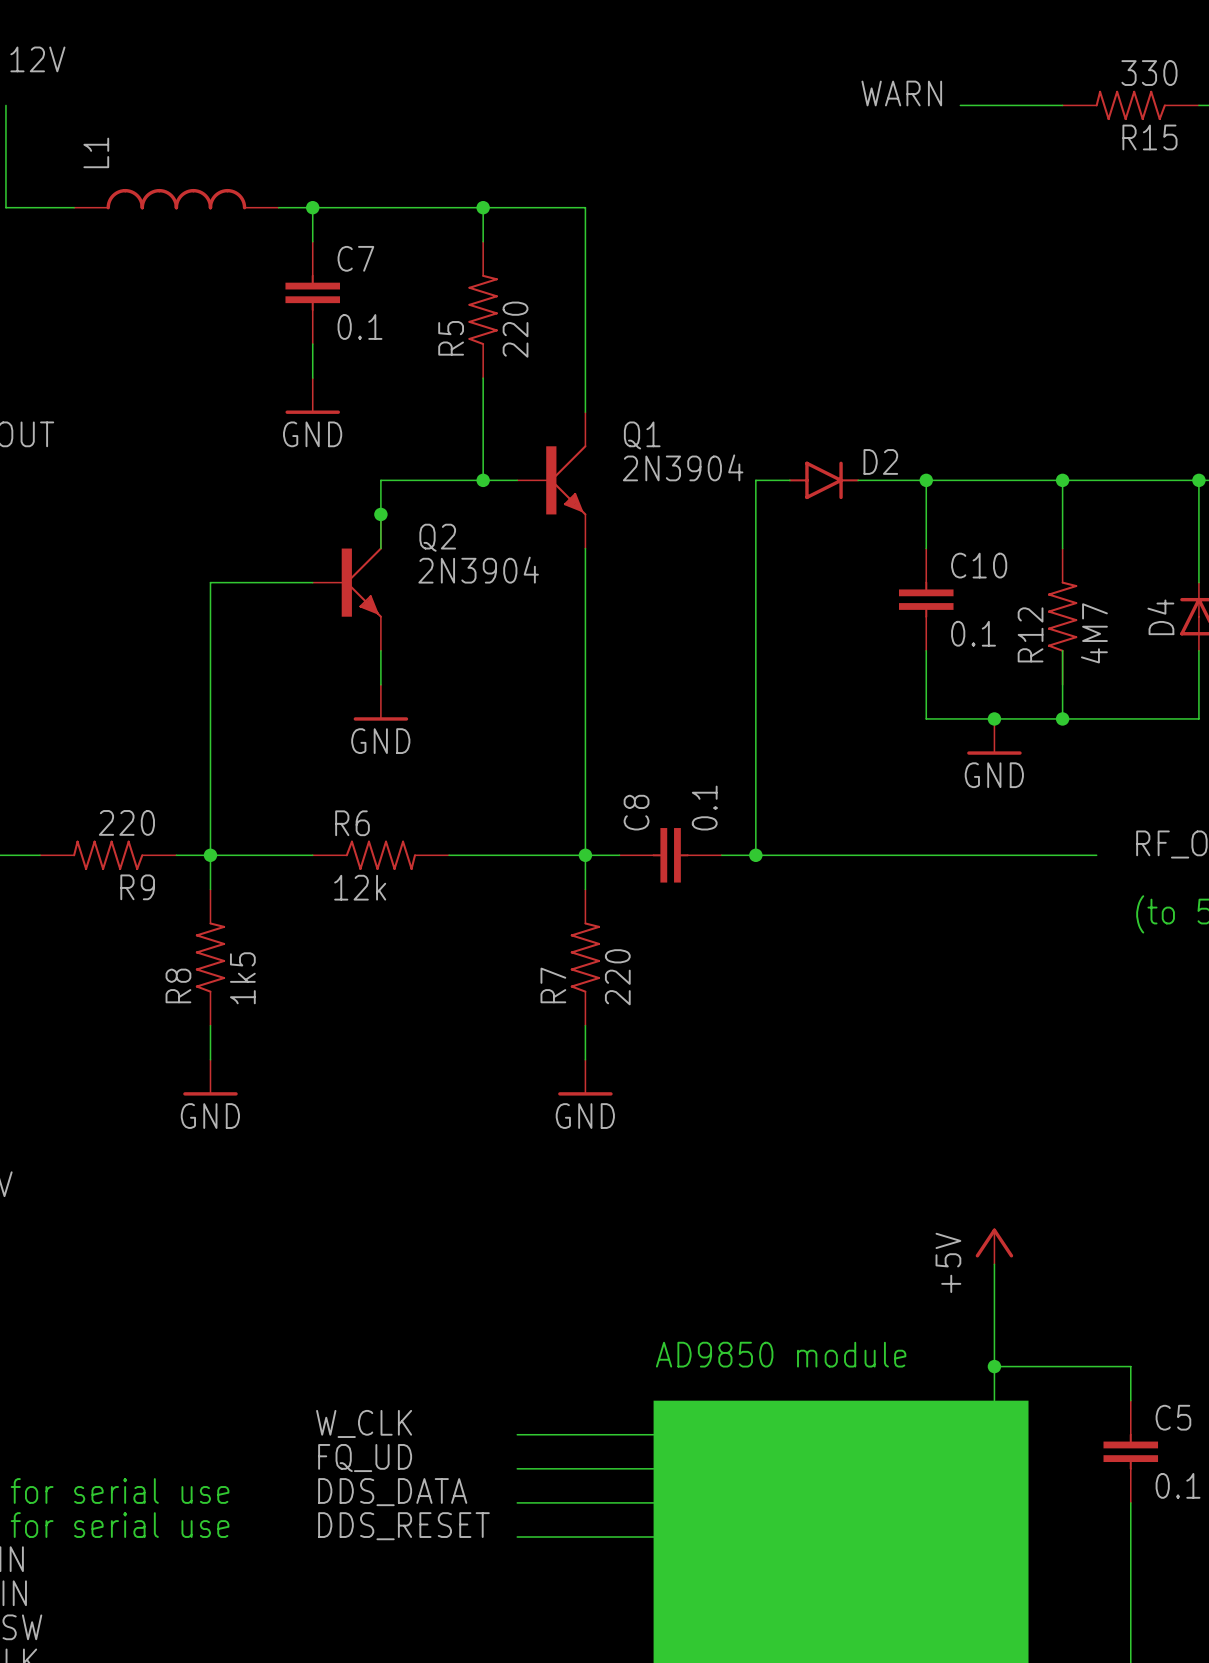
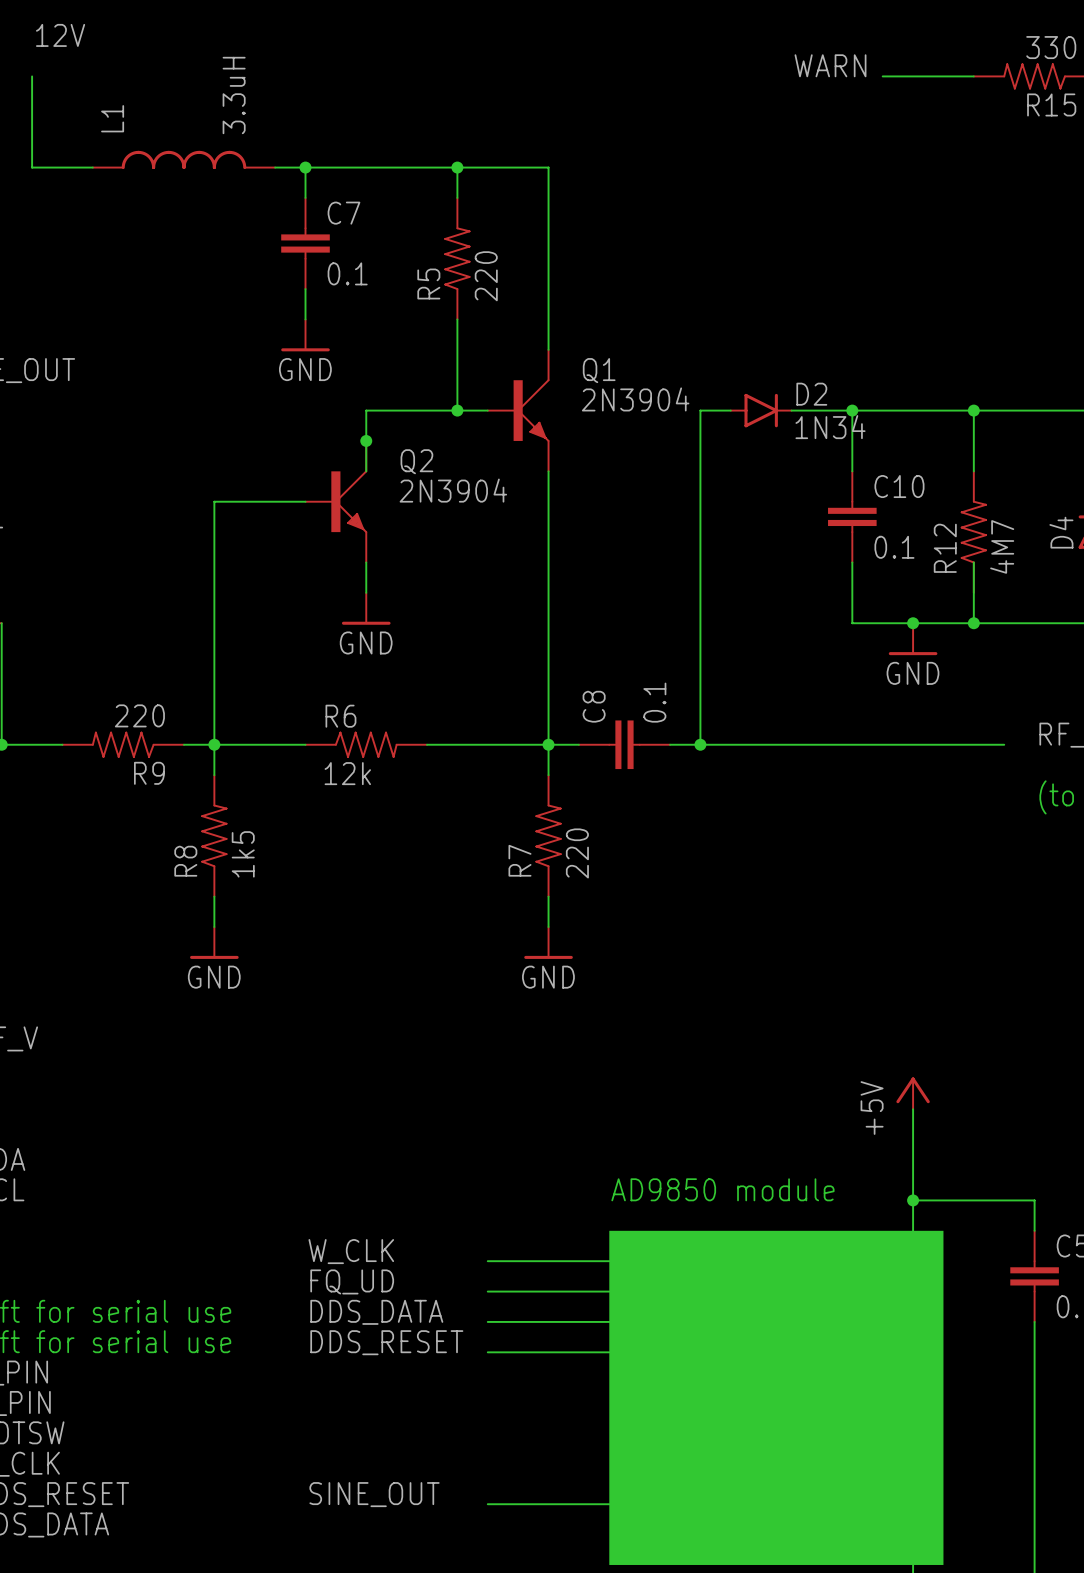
L1 value: none -> 3.3uH (234, 95)
D2 value: none -> 1N34 (830, 427)

